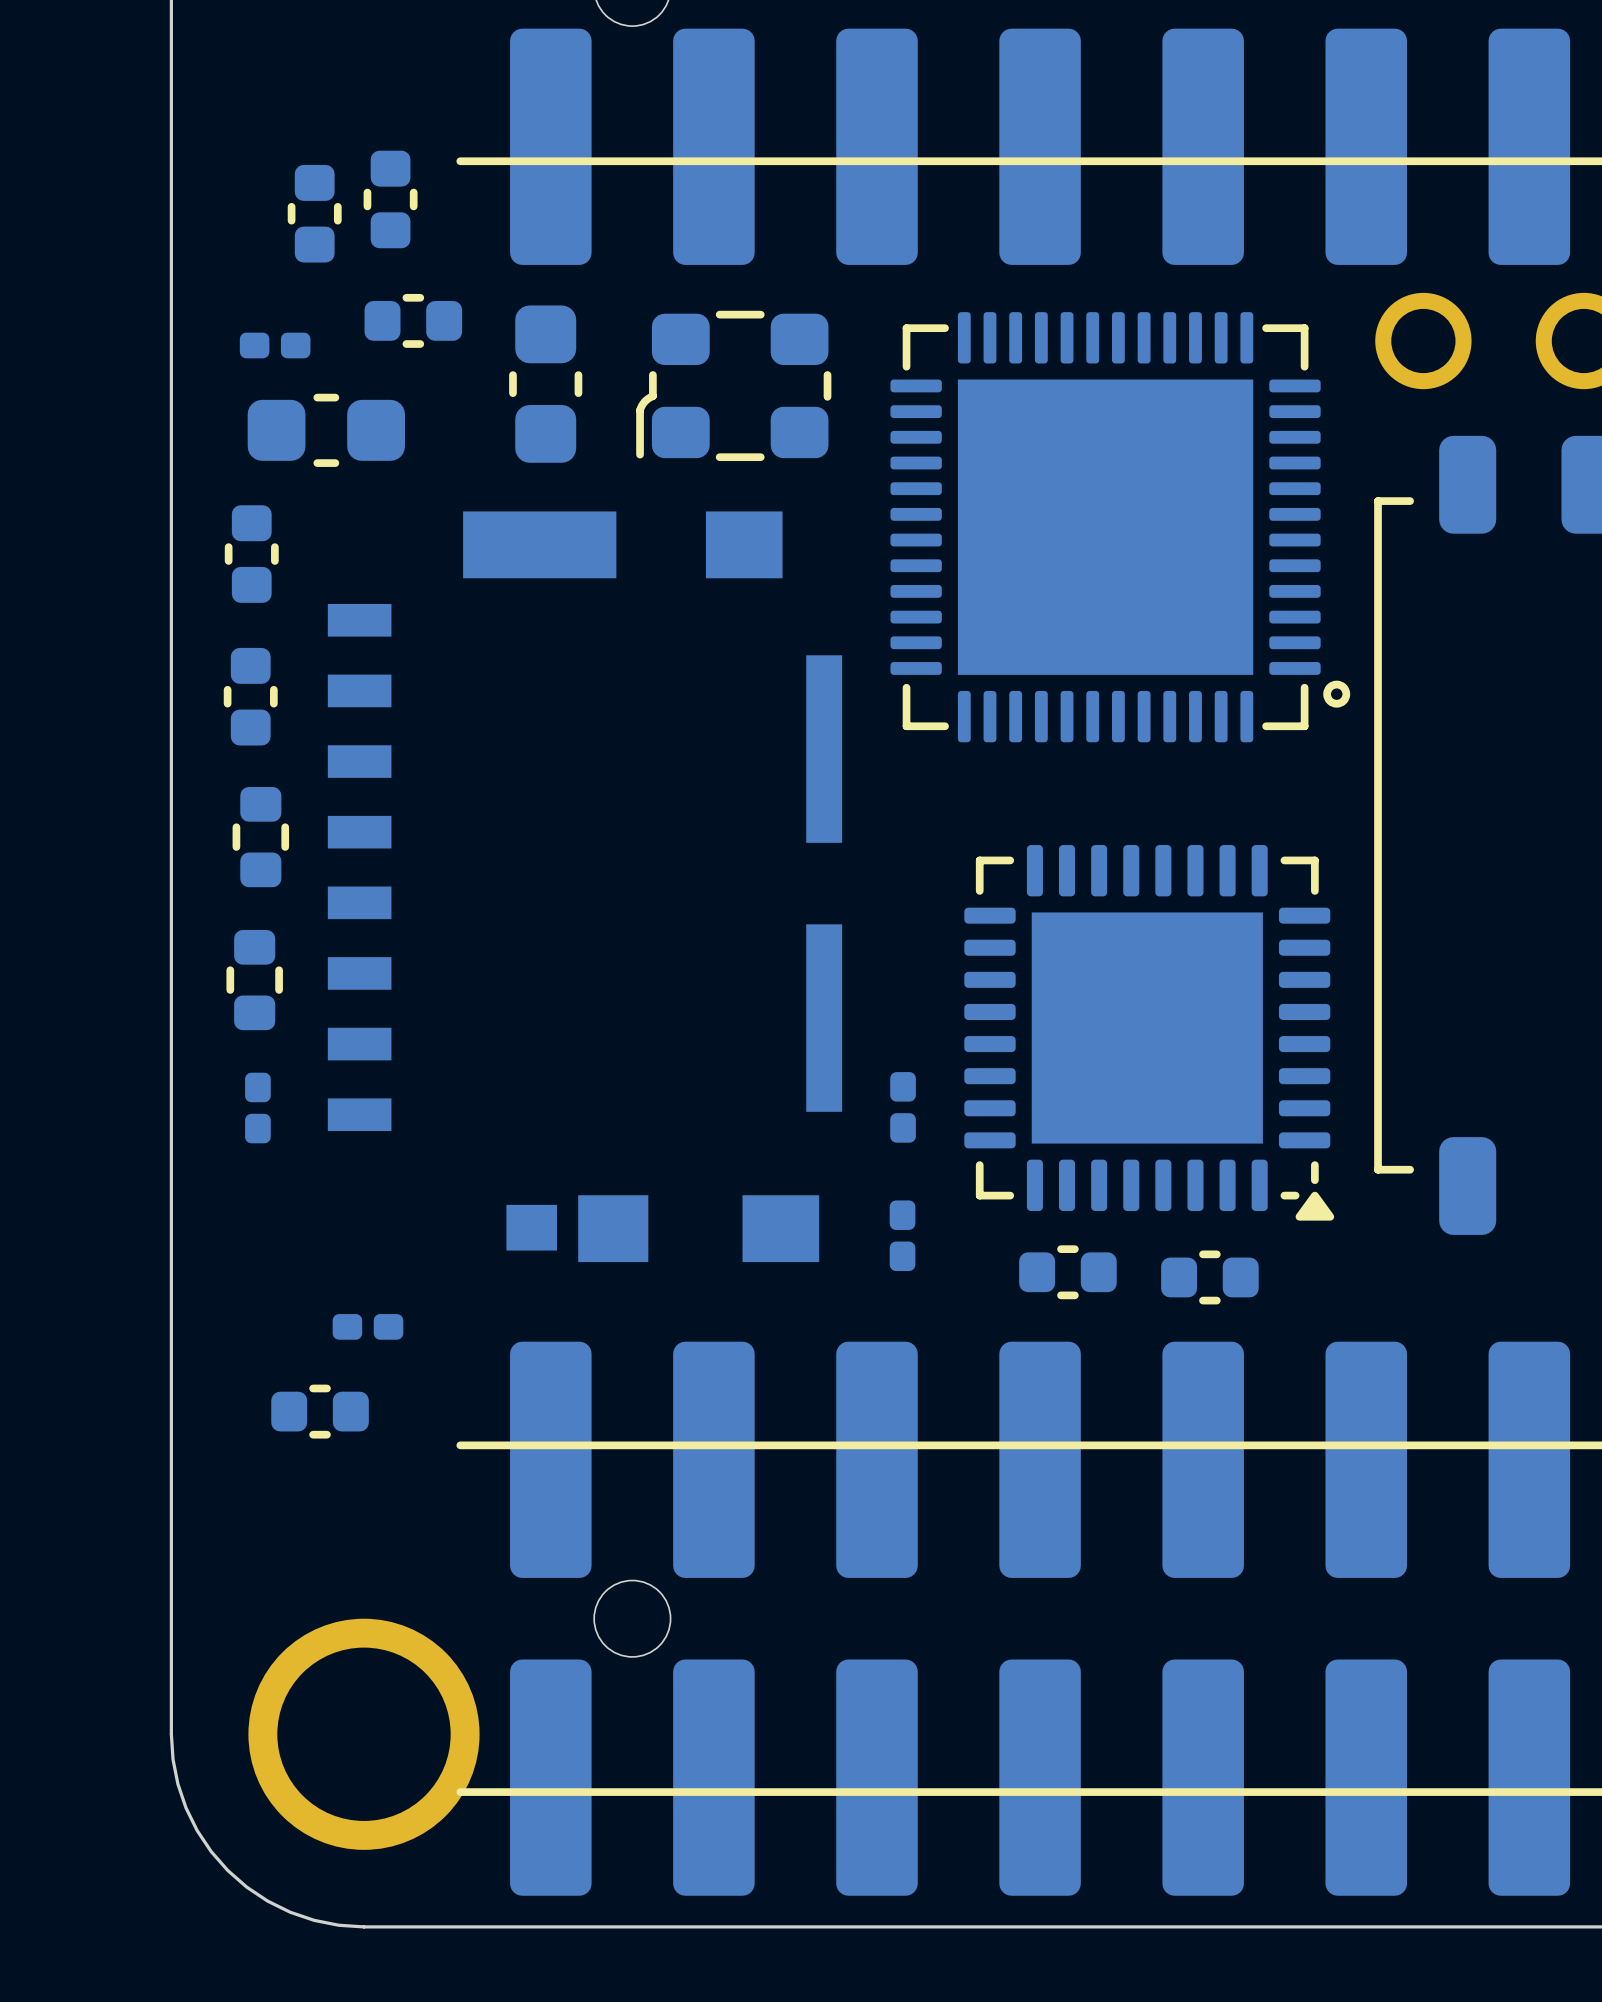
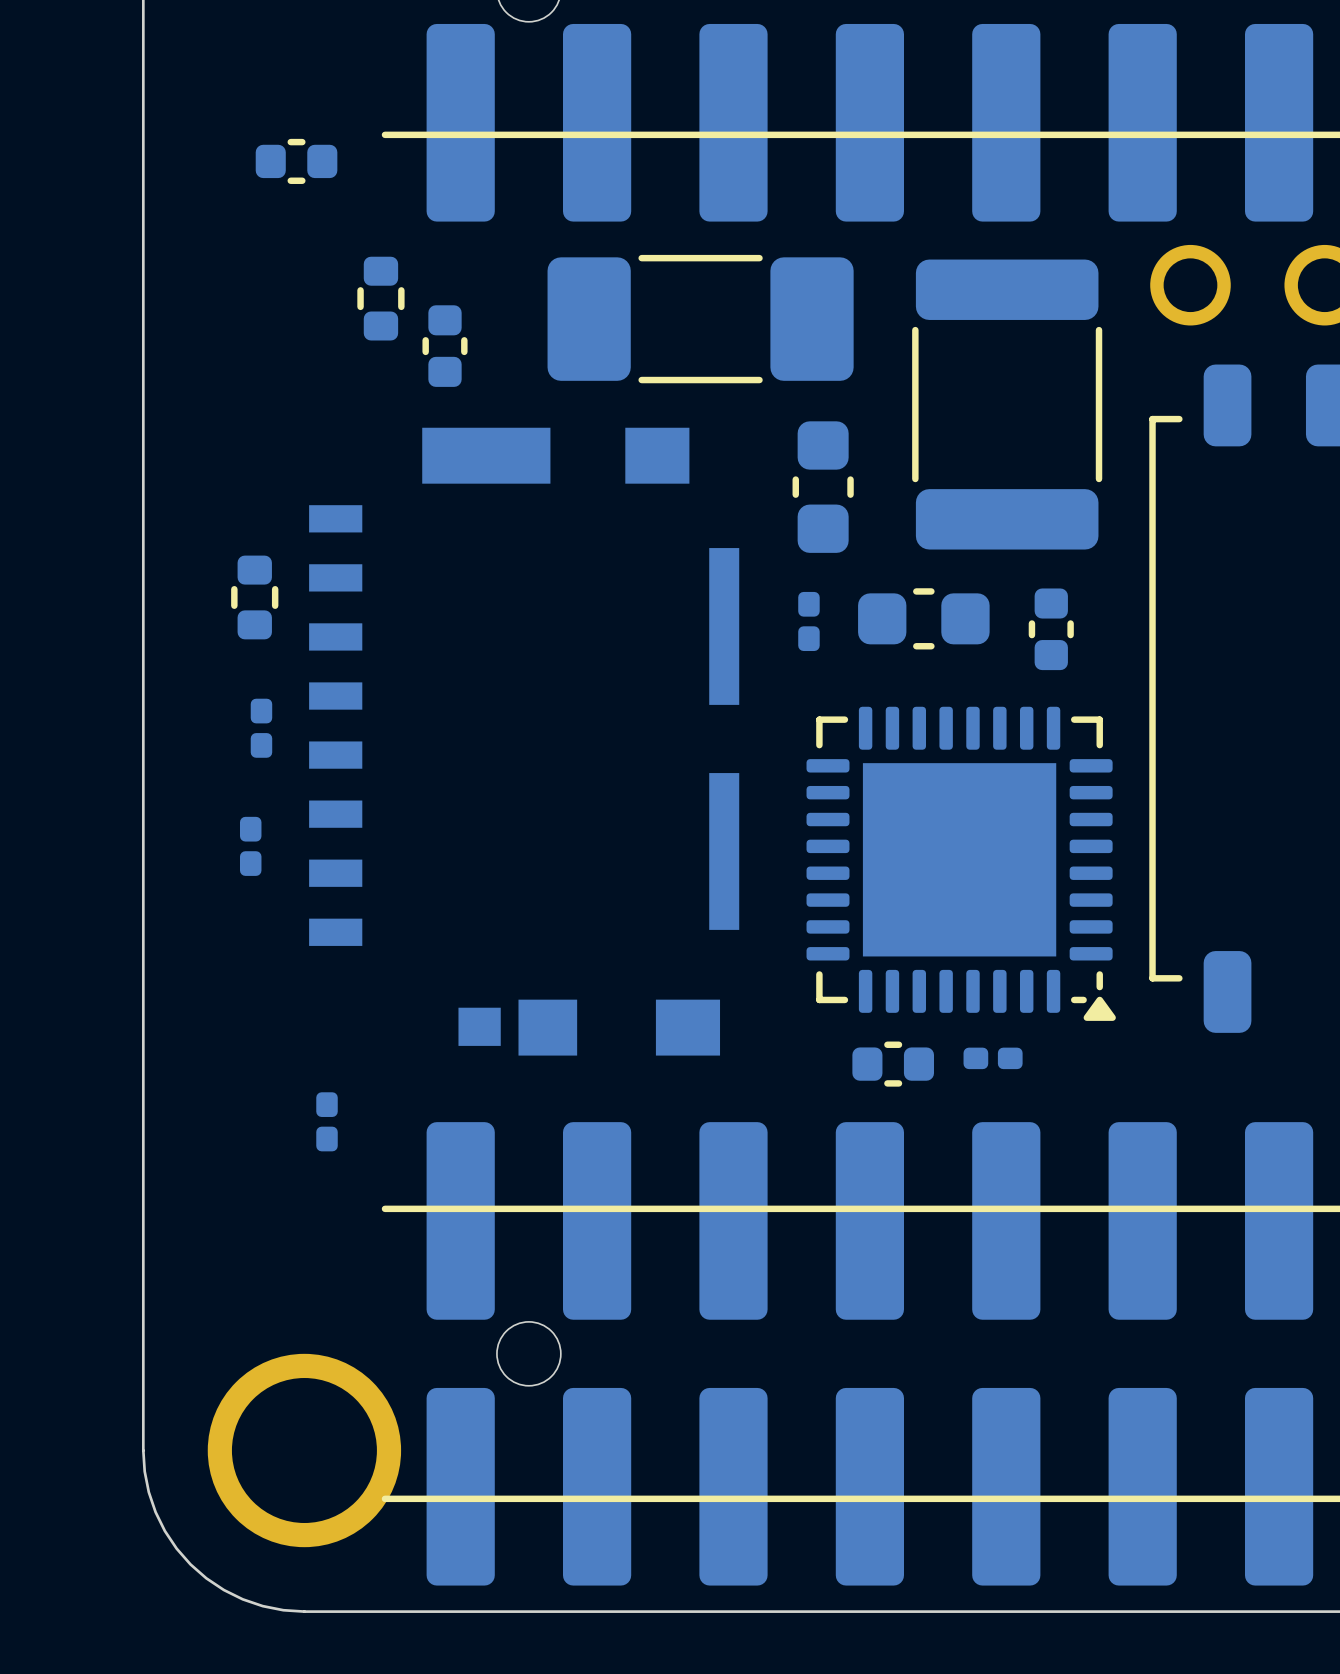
part: none -> (296, 161)
part: (390, 199) -> none
part: (314, 213) -> none
part footprint: [509, 305, 583, 463] -> [422, 305, 468, 387]
part: (413, 320) -> none
part: (275, 345) -> none
part: none -> (380, 298)
part: none -> (700, 319)
part: (733, 385) -> none
part: (326, 430) -> none
part: none -> (1007, 404)
part: (1120, 527) -> none
part: (251, 554) -> none
part: none -> (823, 487)
part footprint: [223, 647, 278, 746] -> [231, 555, 279, 640]
part: none -> (923, 618)
part: none -> (808, 621)
part: none -> (1051, 629)
part: (260, 837) -> none
part: none -> (261, 728)
part position: (584, 886) -> (524, 741)
part: (254, 980) -> none
part: (903, 1107) -> none
part position: (257, 1108) -> (250, 846)
part: (902, 1235) -> none
part footprint: [1161, 1250, 1259, 1305] -> [963, 1047, 1023, 1070]
part rotation: 0° (367, 1326) -> 90° clockwise (327, 1121)
part: (320, 1411) -> none

